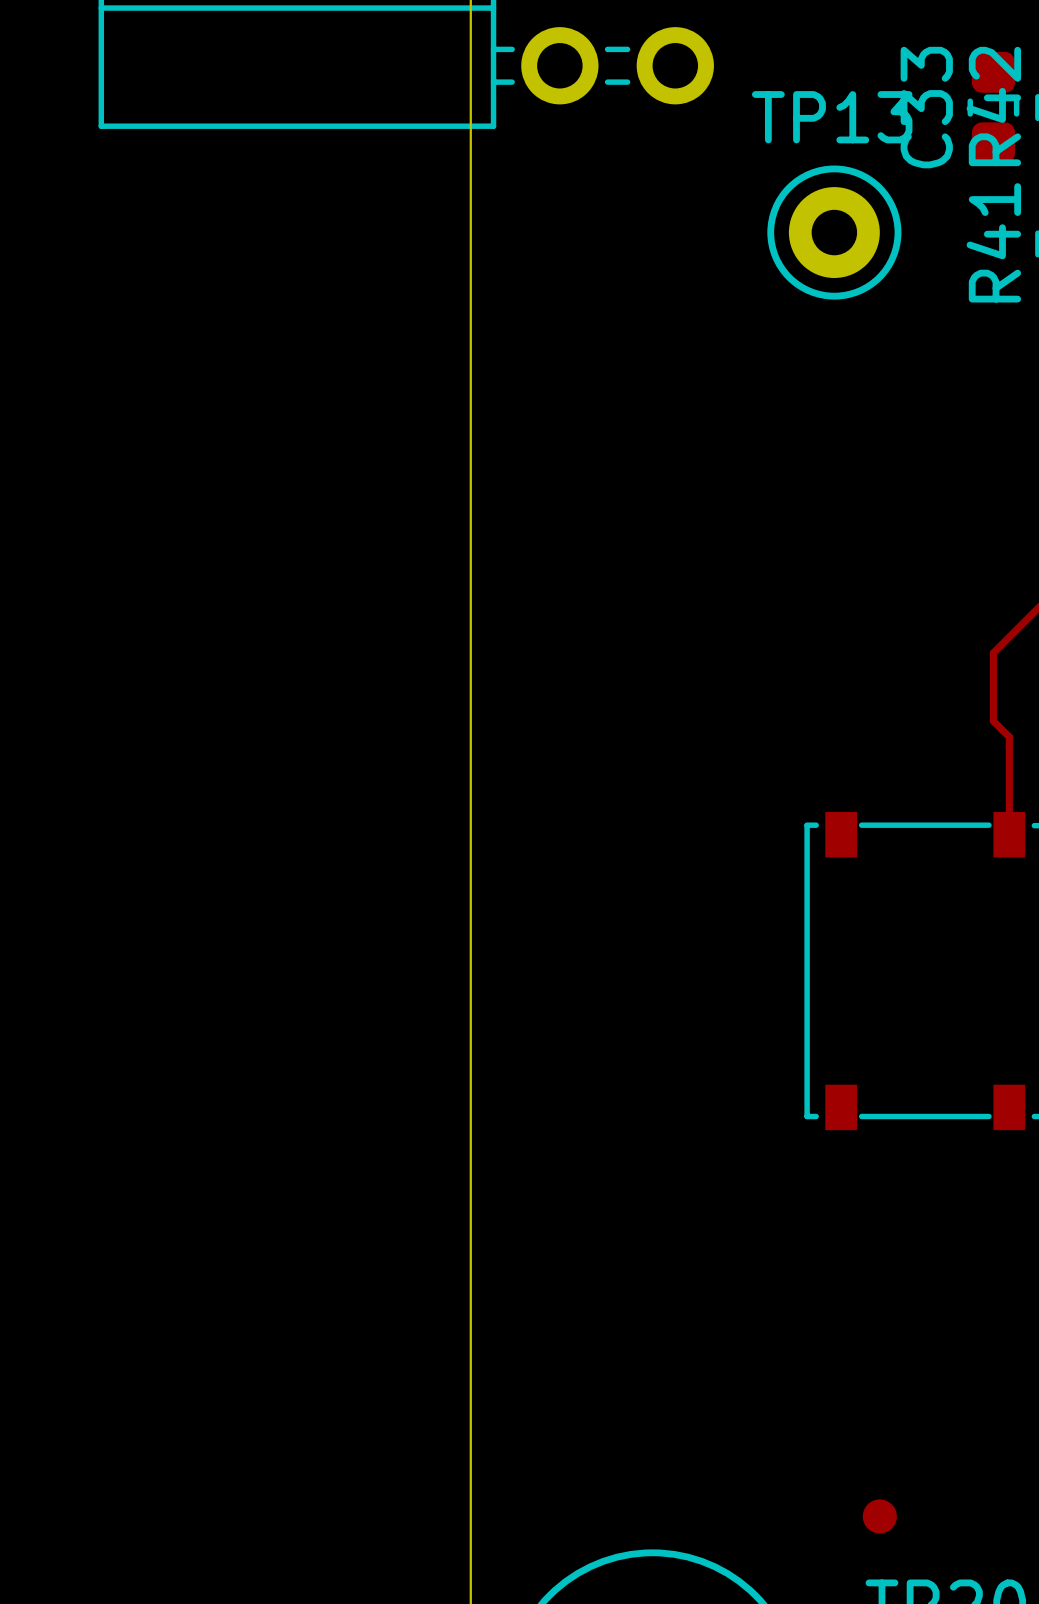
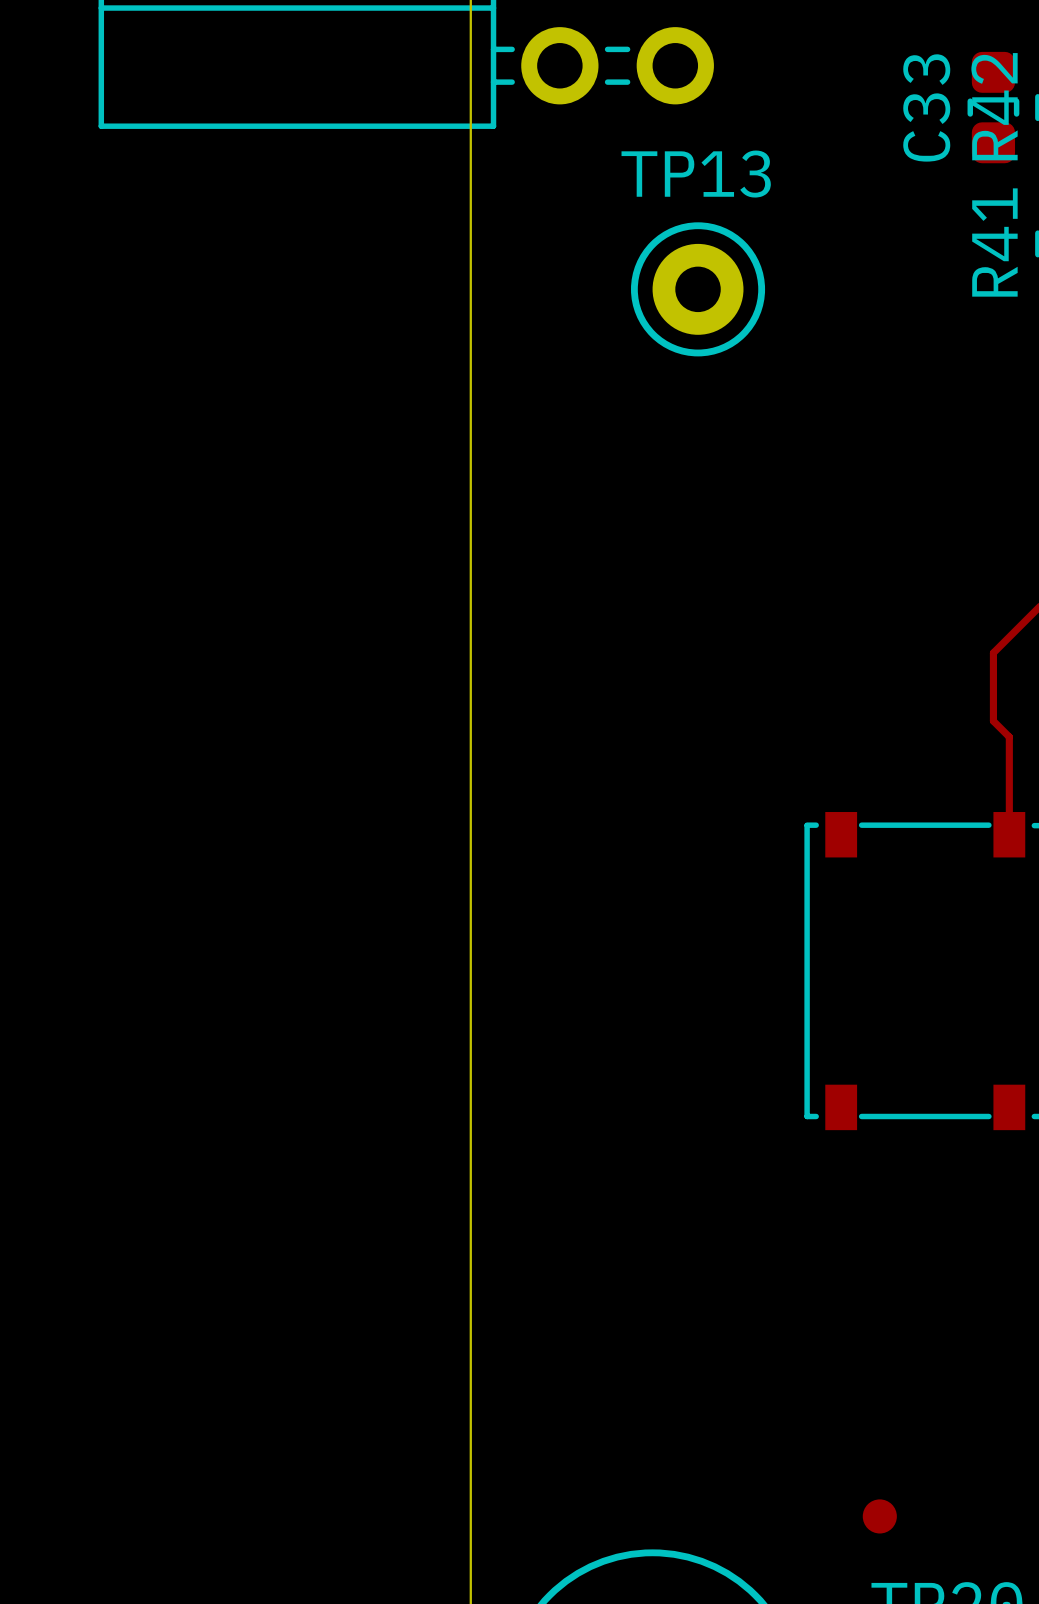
TP13 position: (834, 232) -> (698, 289)

